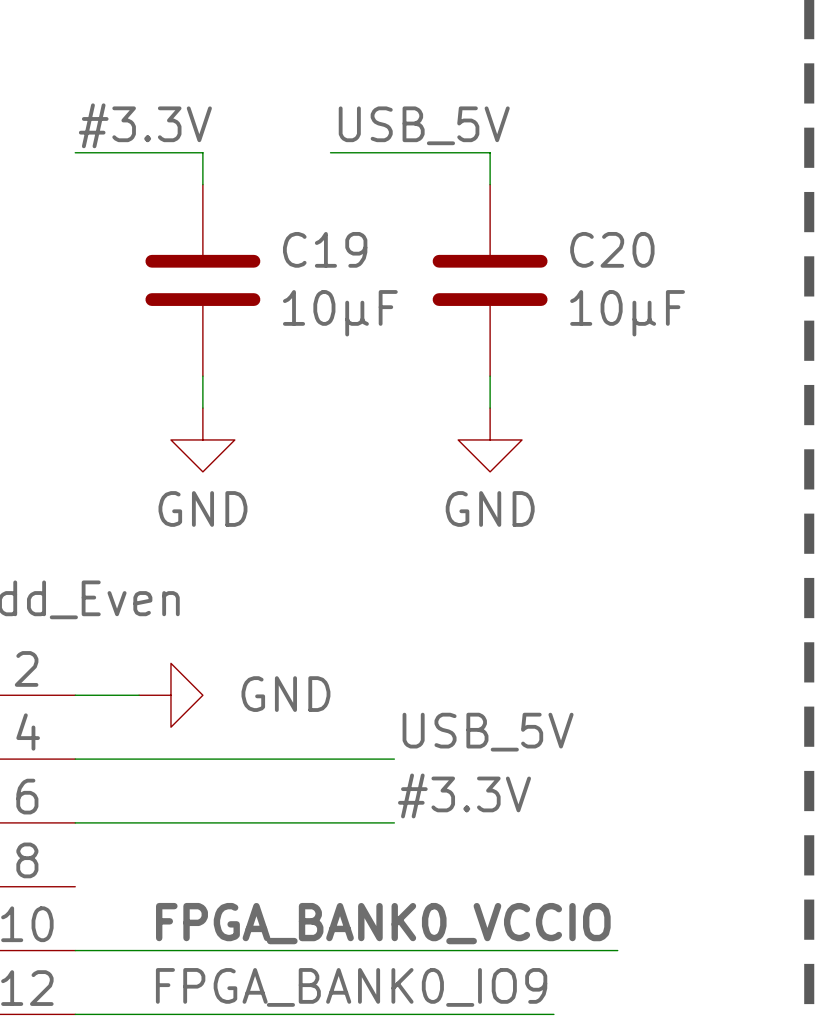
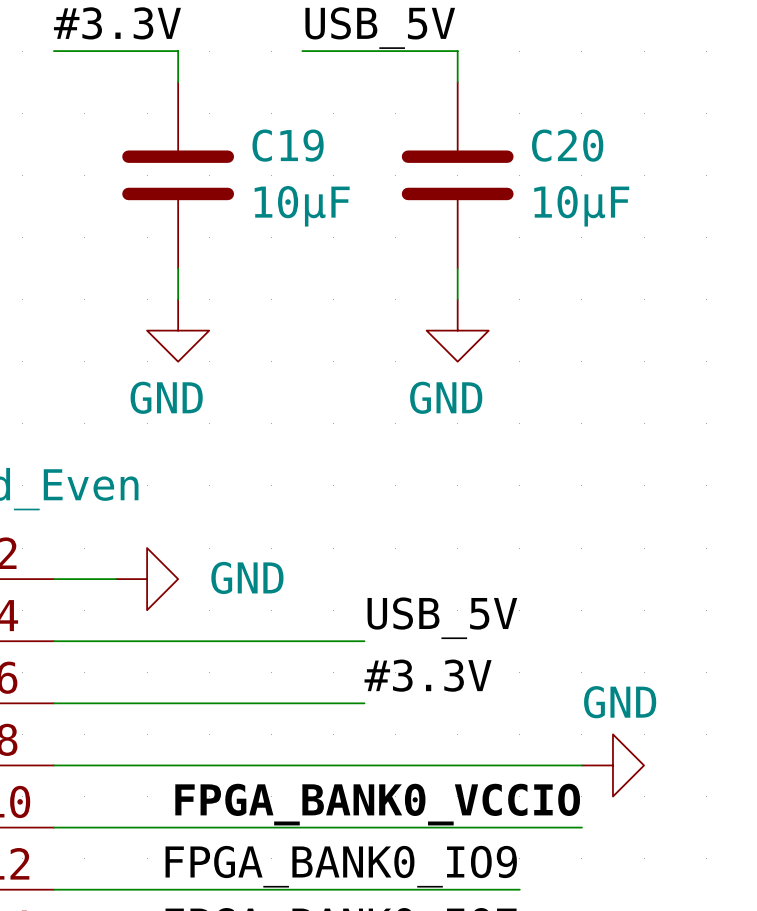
wire: none -> (53, 765) (581, 765)
power symbol: none -> GND (612, 765)

